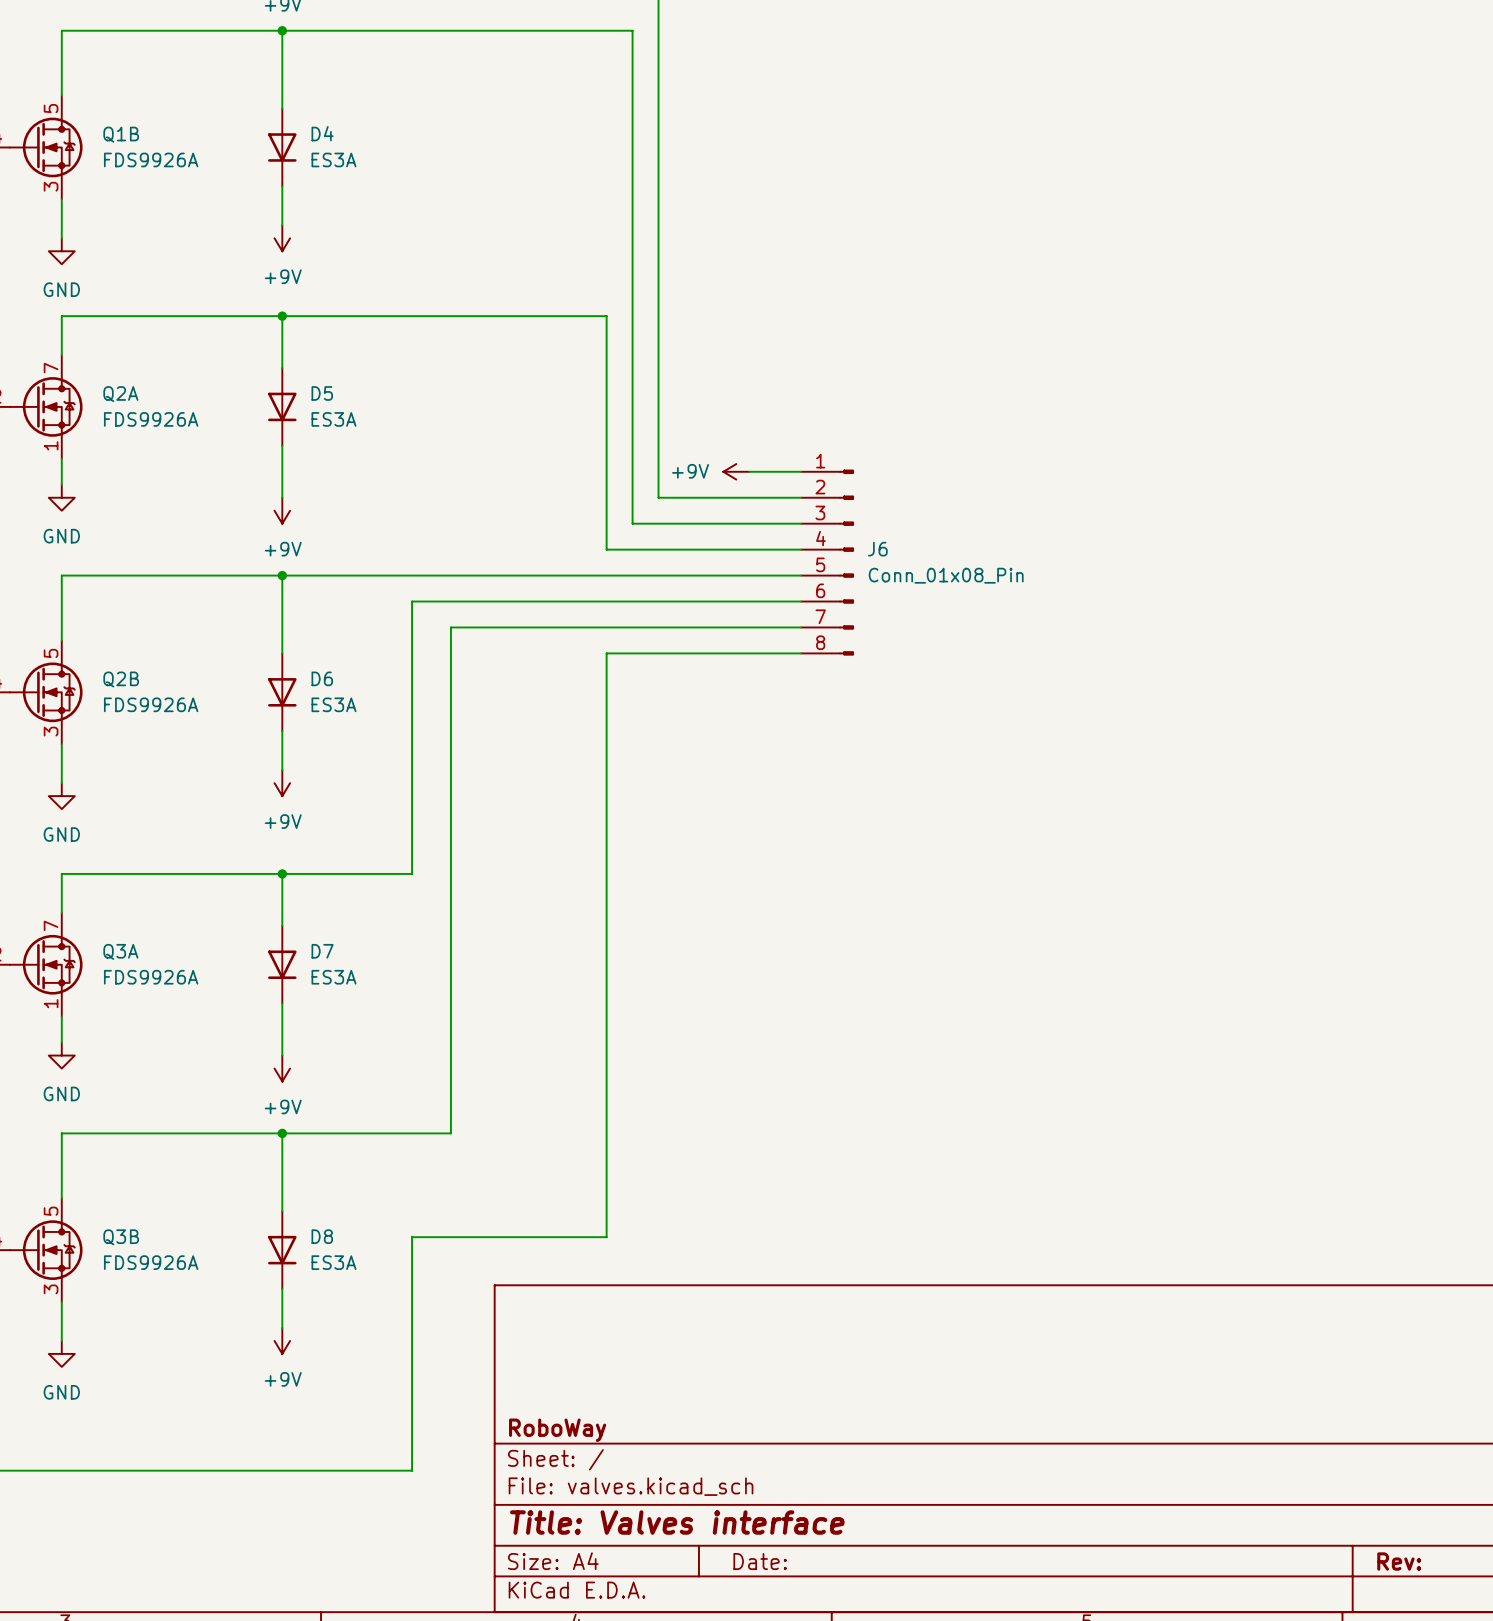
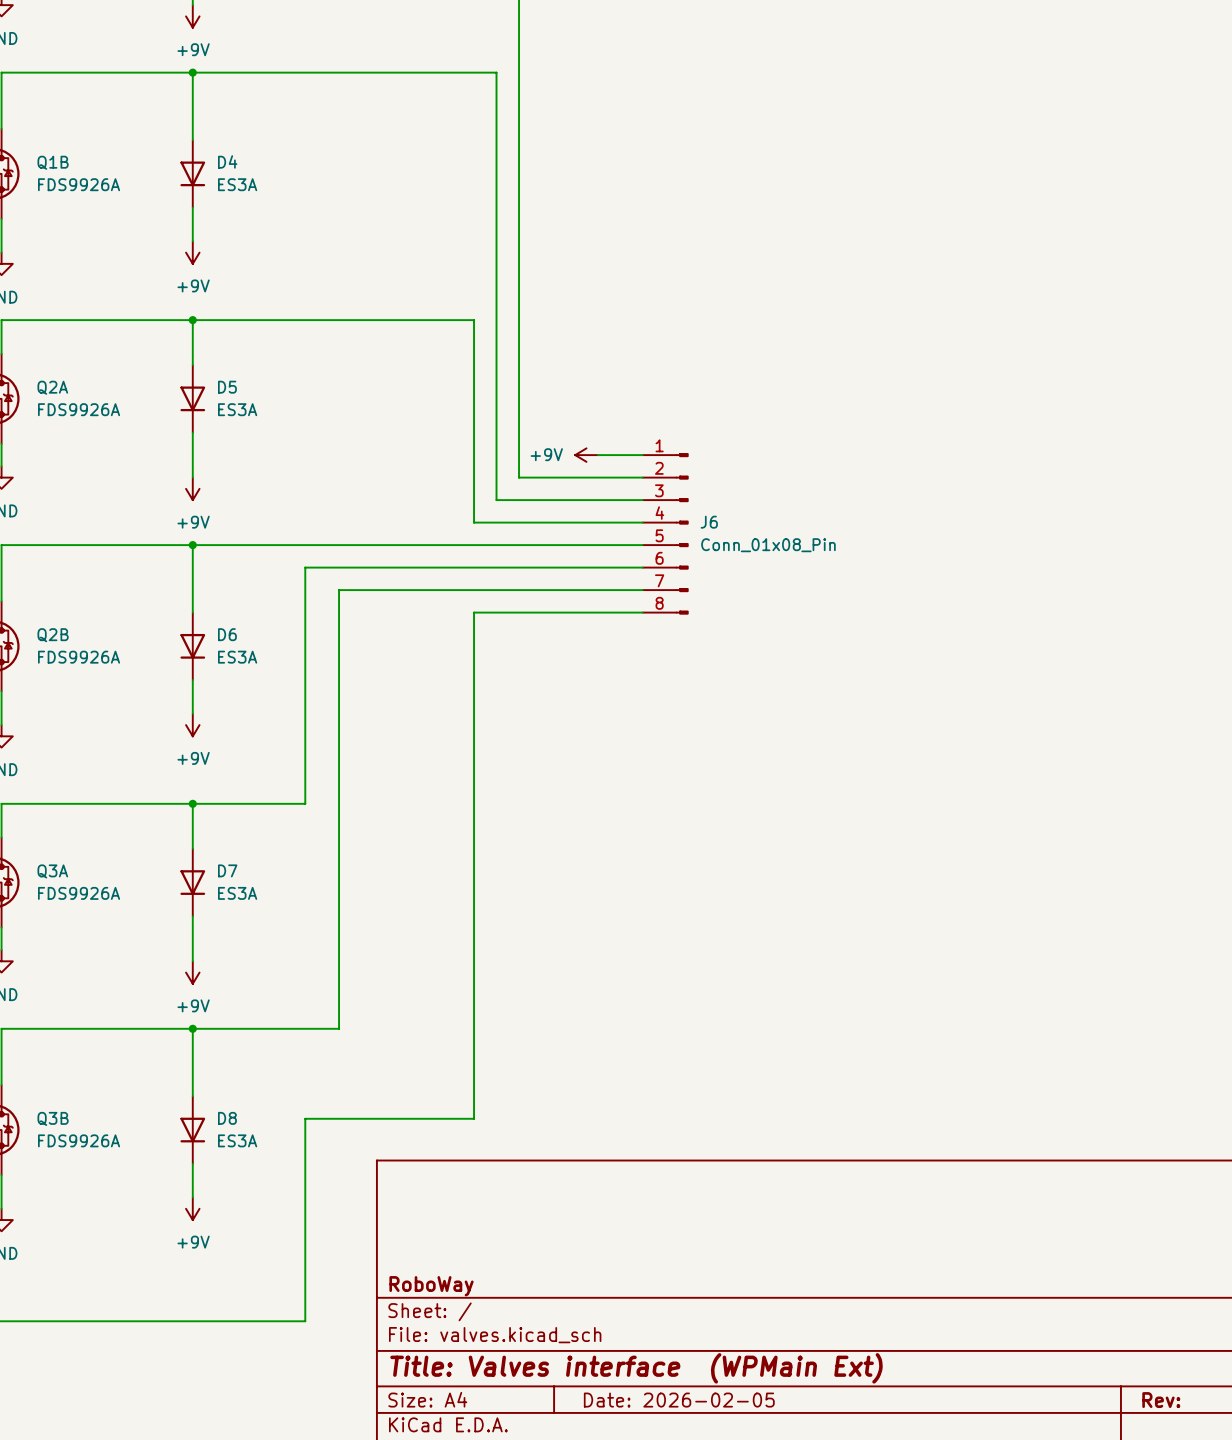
title block: Title: Valves interface (677, 1522) -> Title: Valves interface (WPMain Ext) (636, 1368)
title block: Date: (760, 1561) -> Date: 2026-02-05 (679, 1400)

